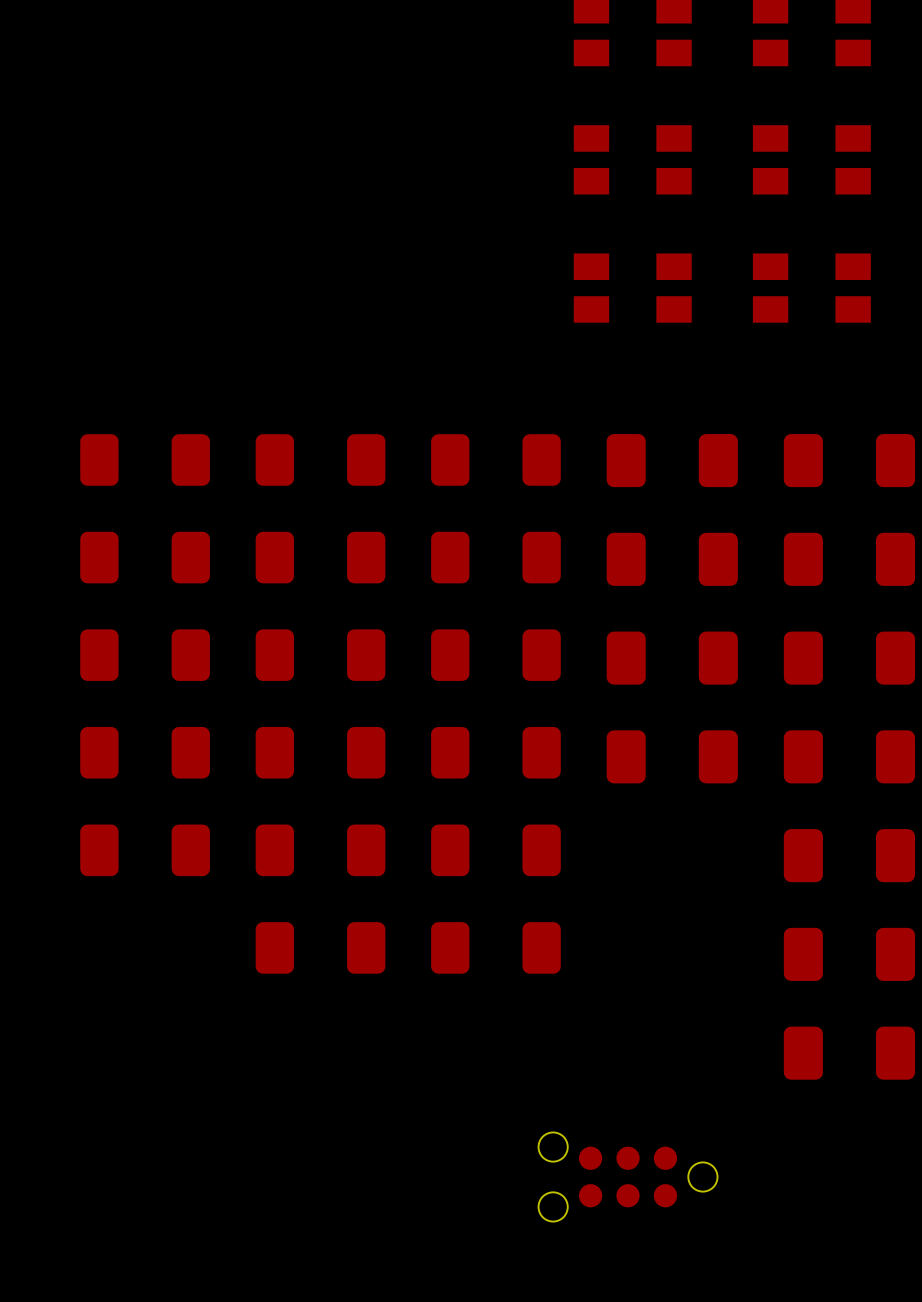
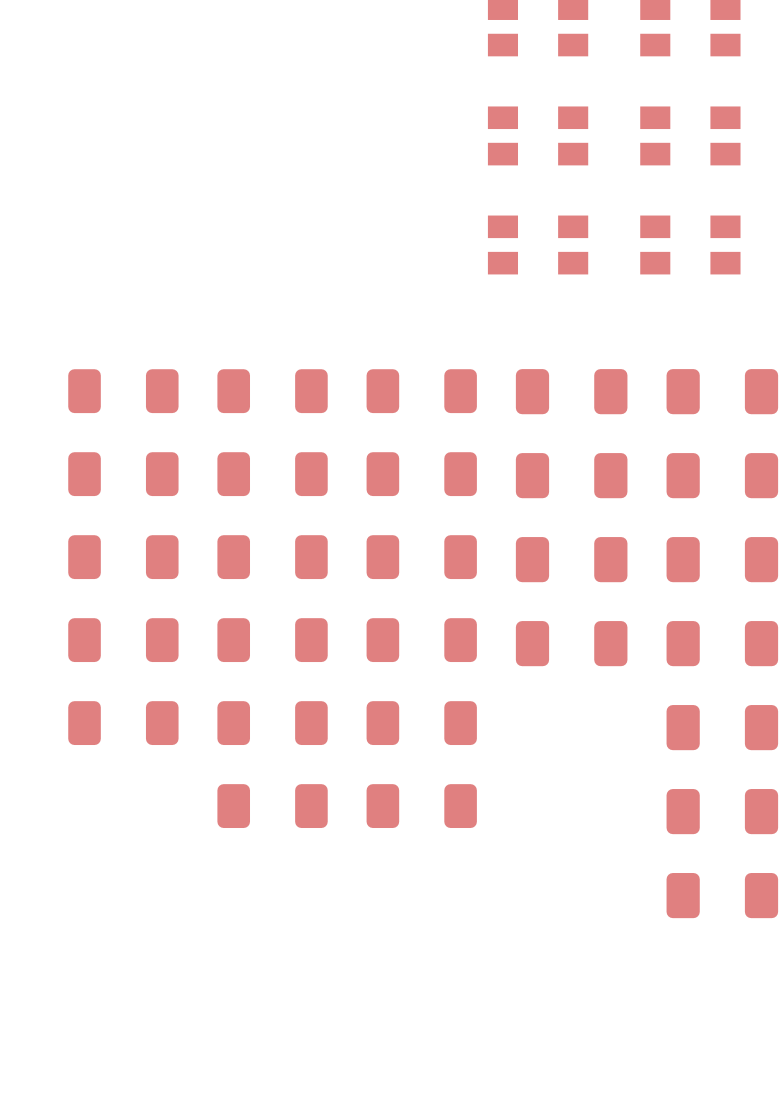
part: (628, 1177) -> none

